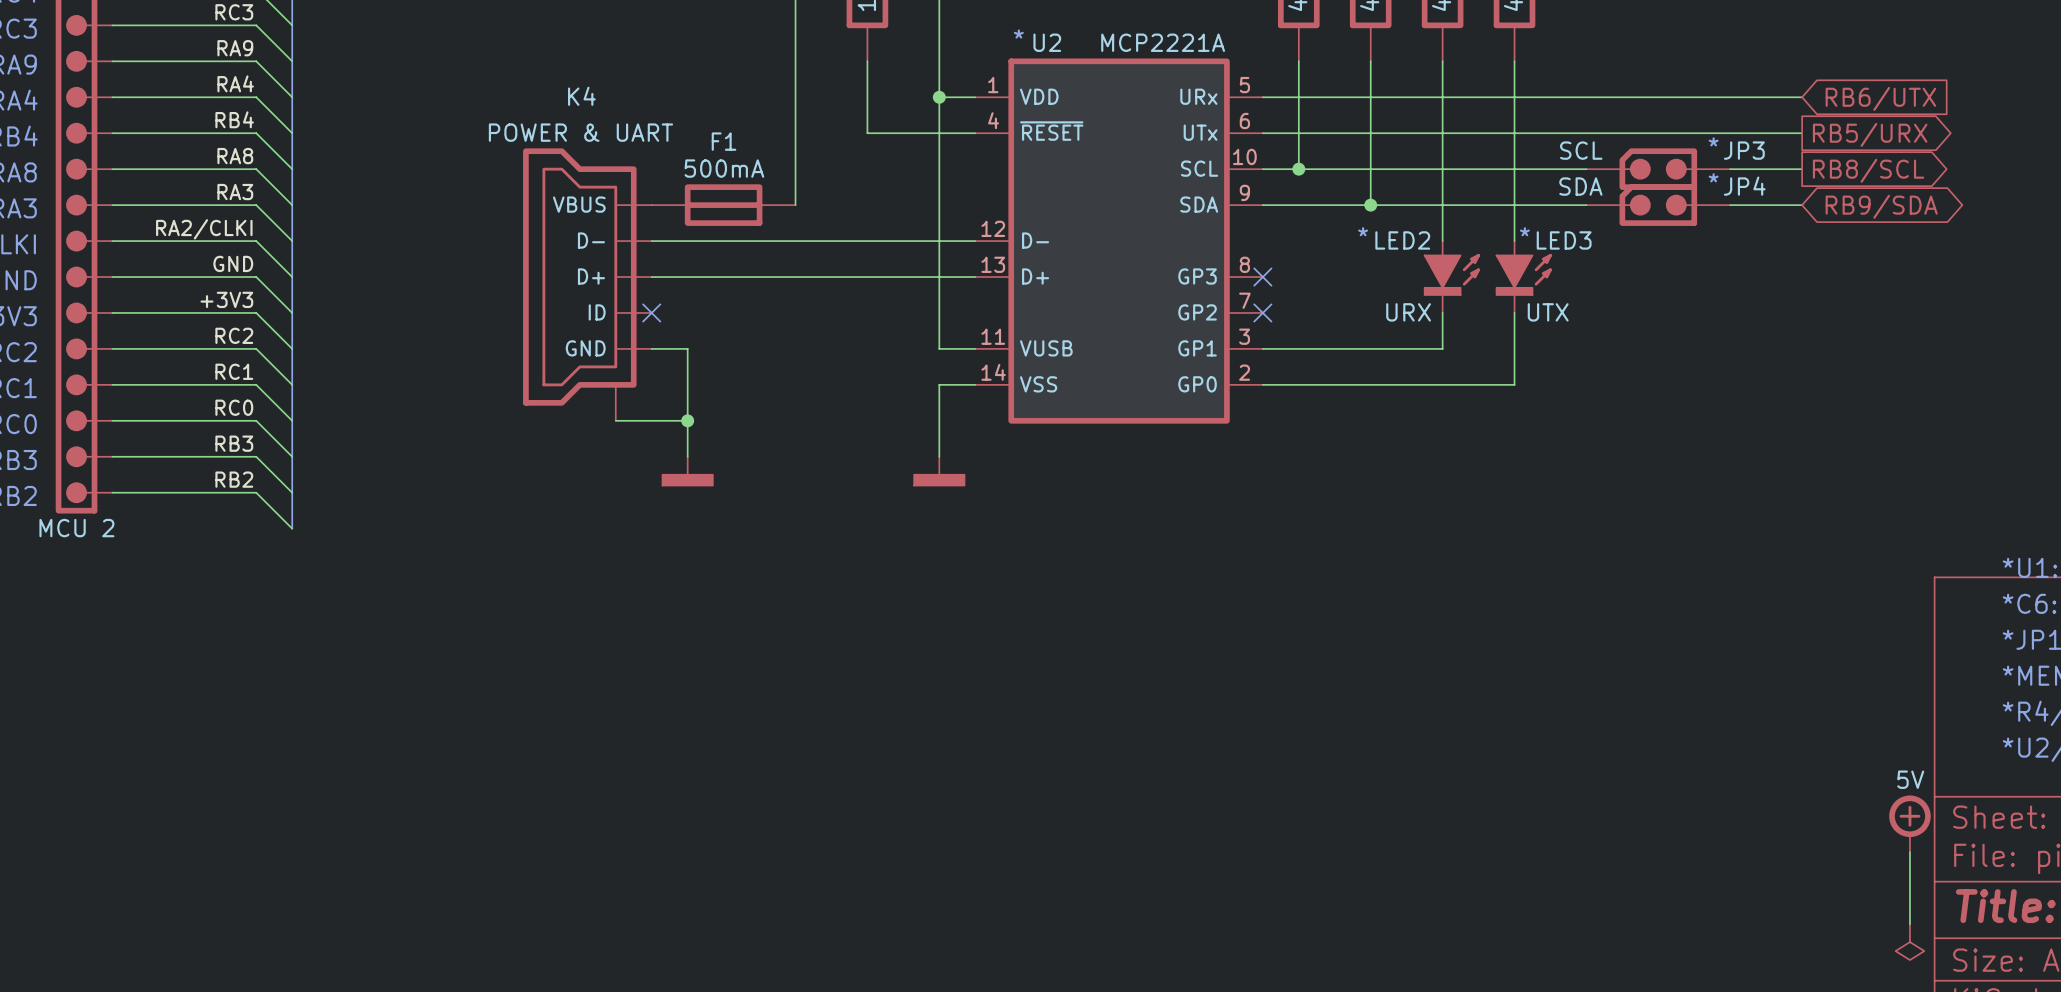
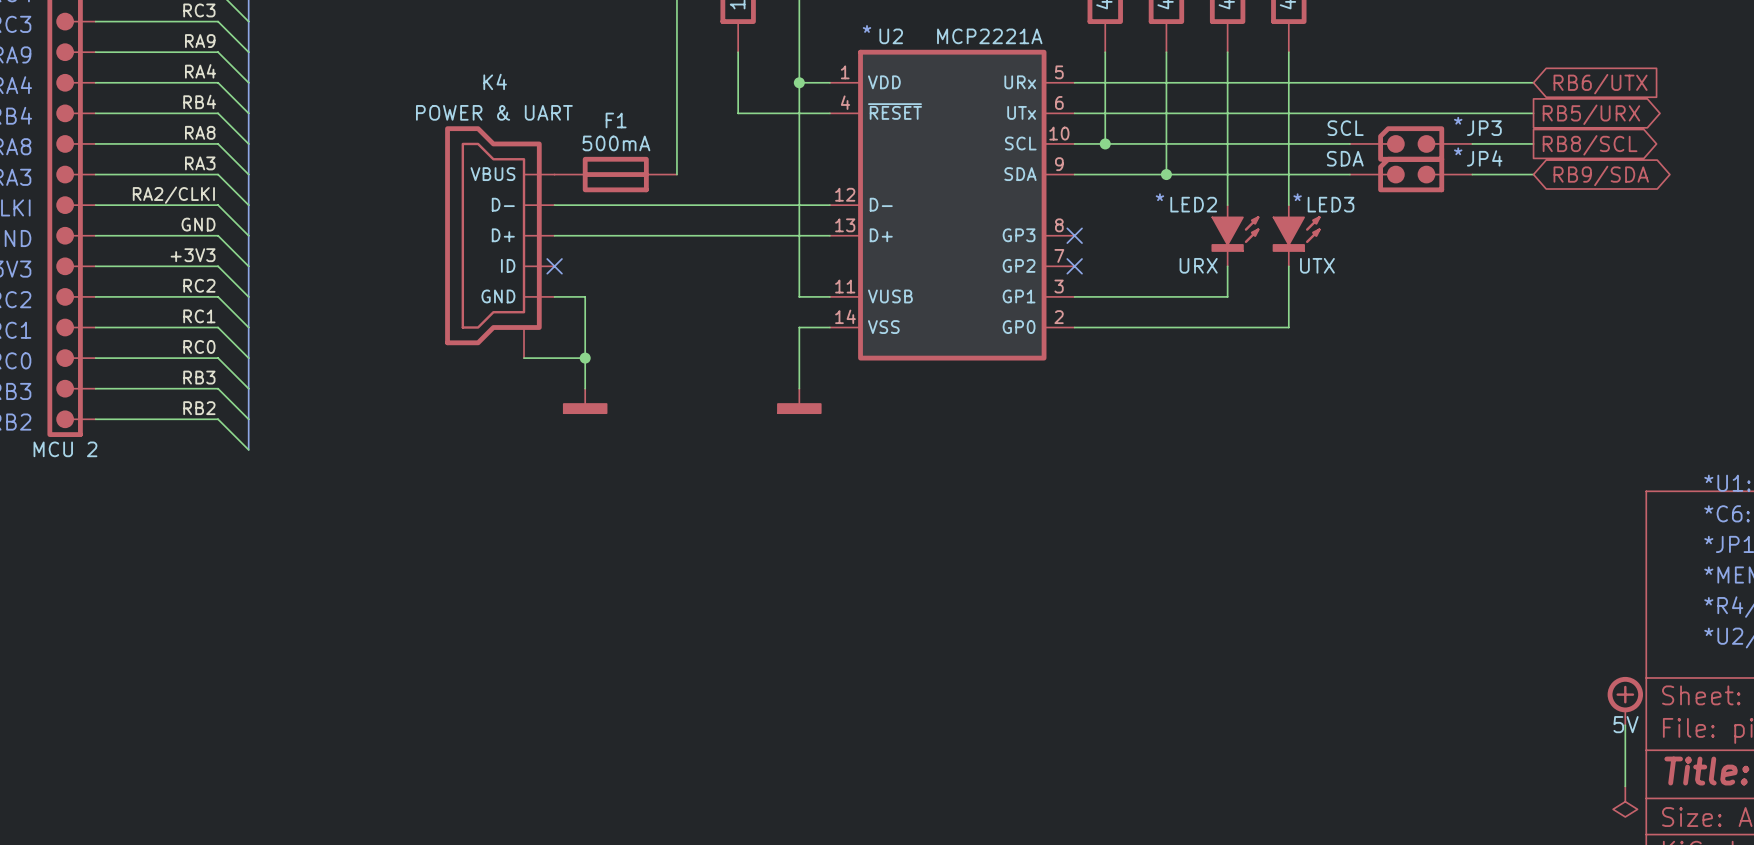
power symbol text position: 5V (1910, 779) -> 5V (1626, 724)

